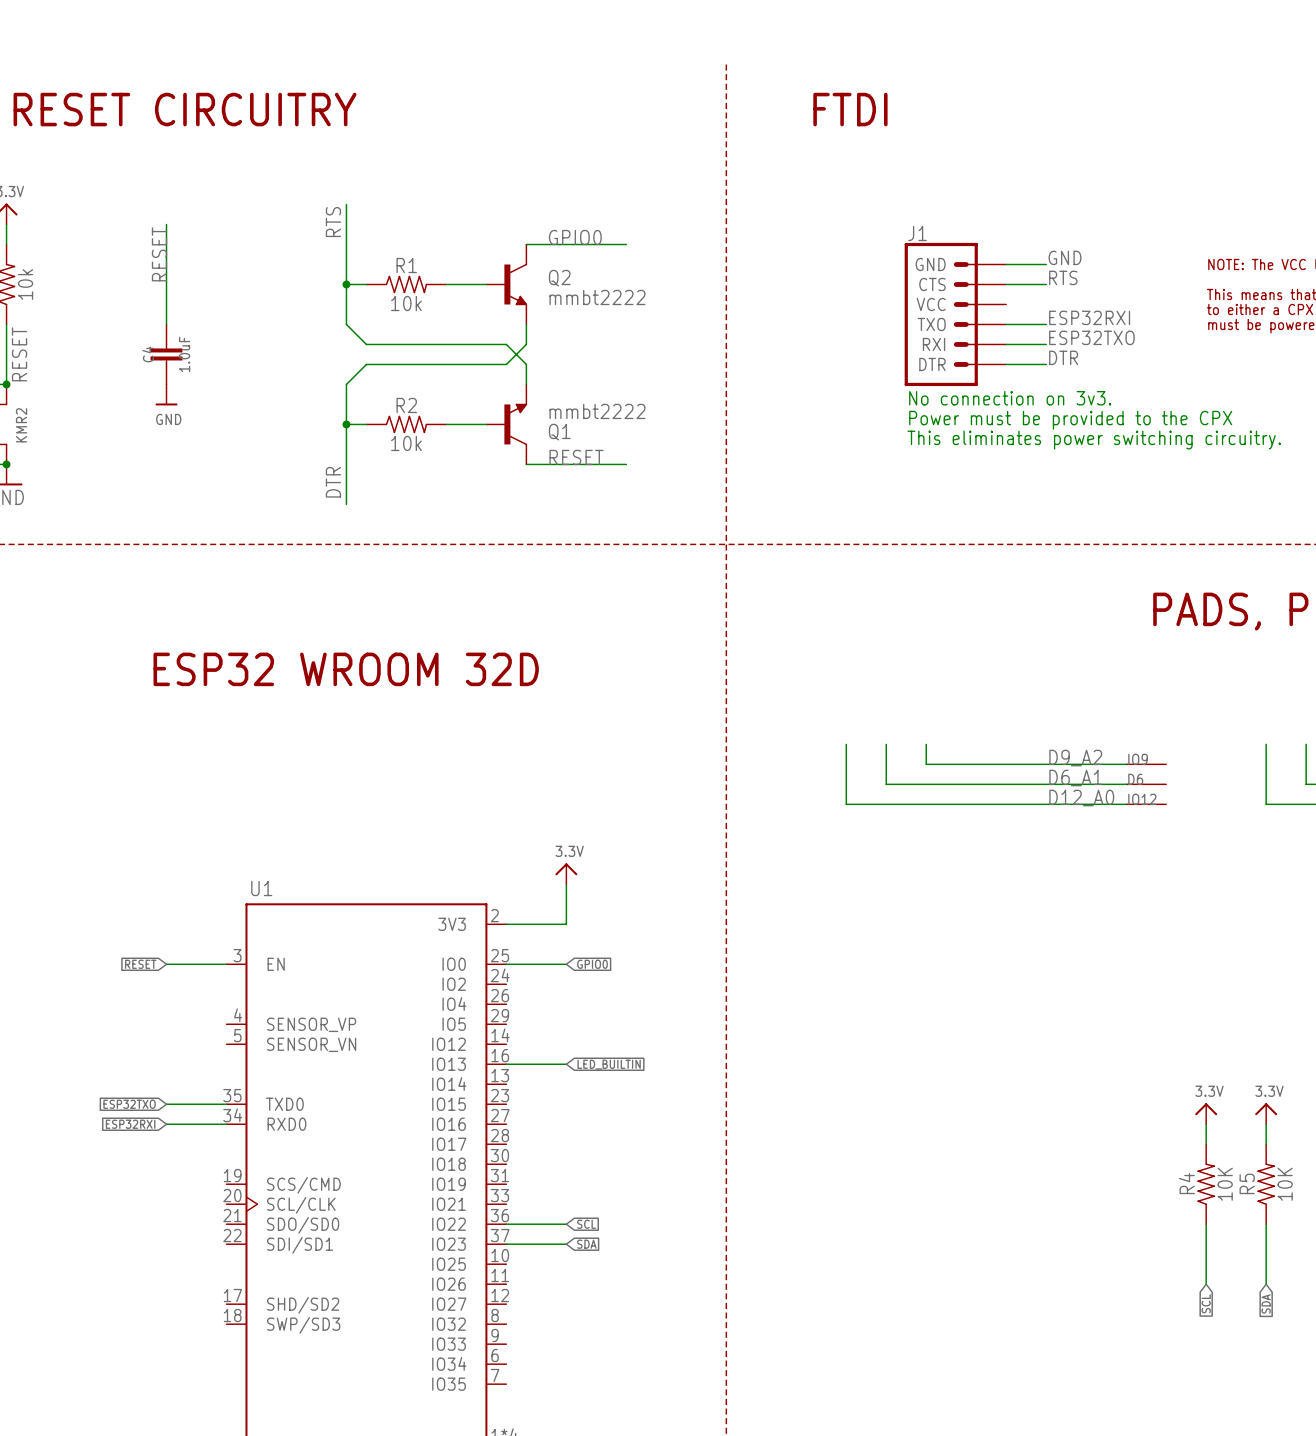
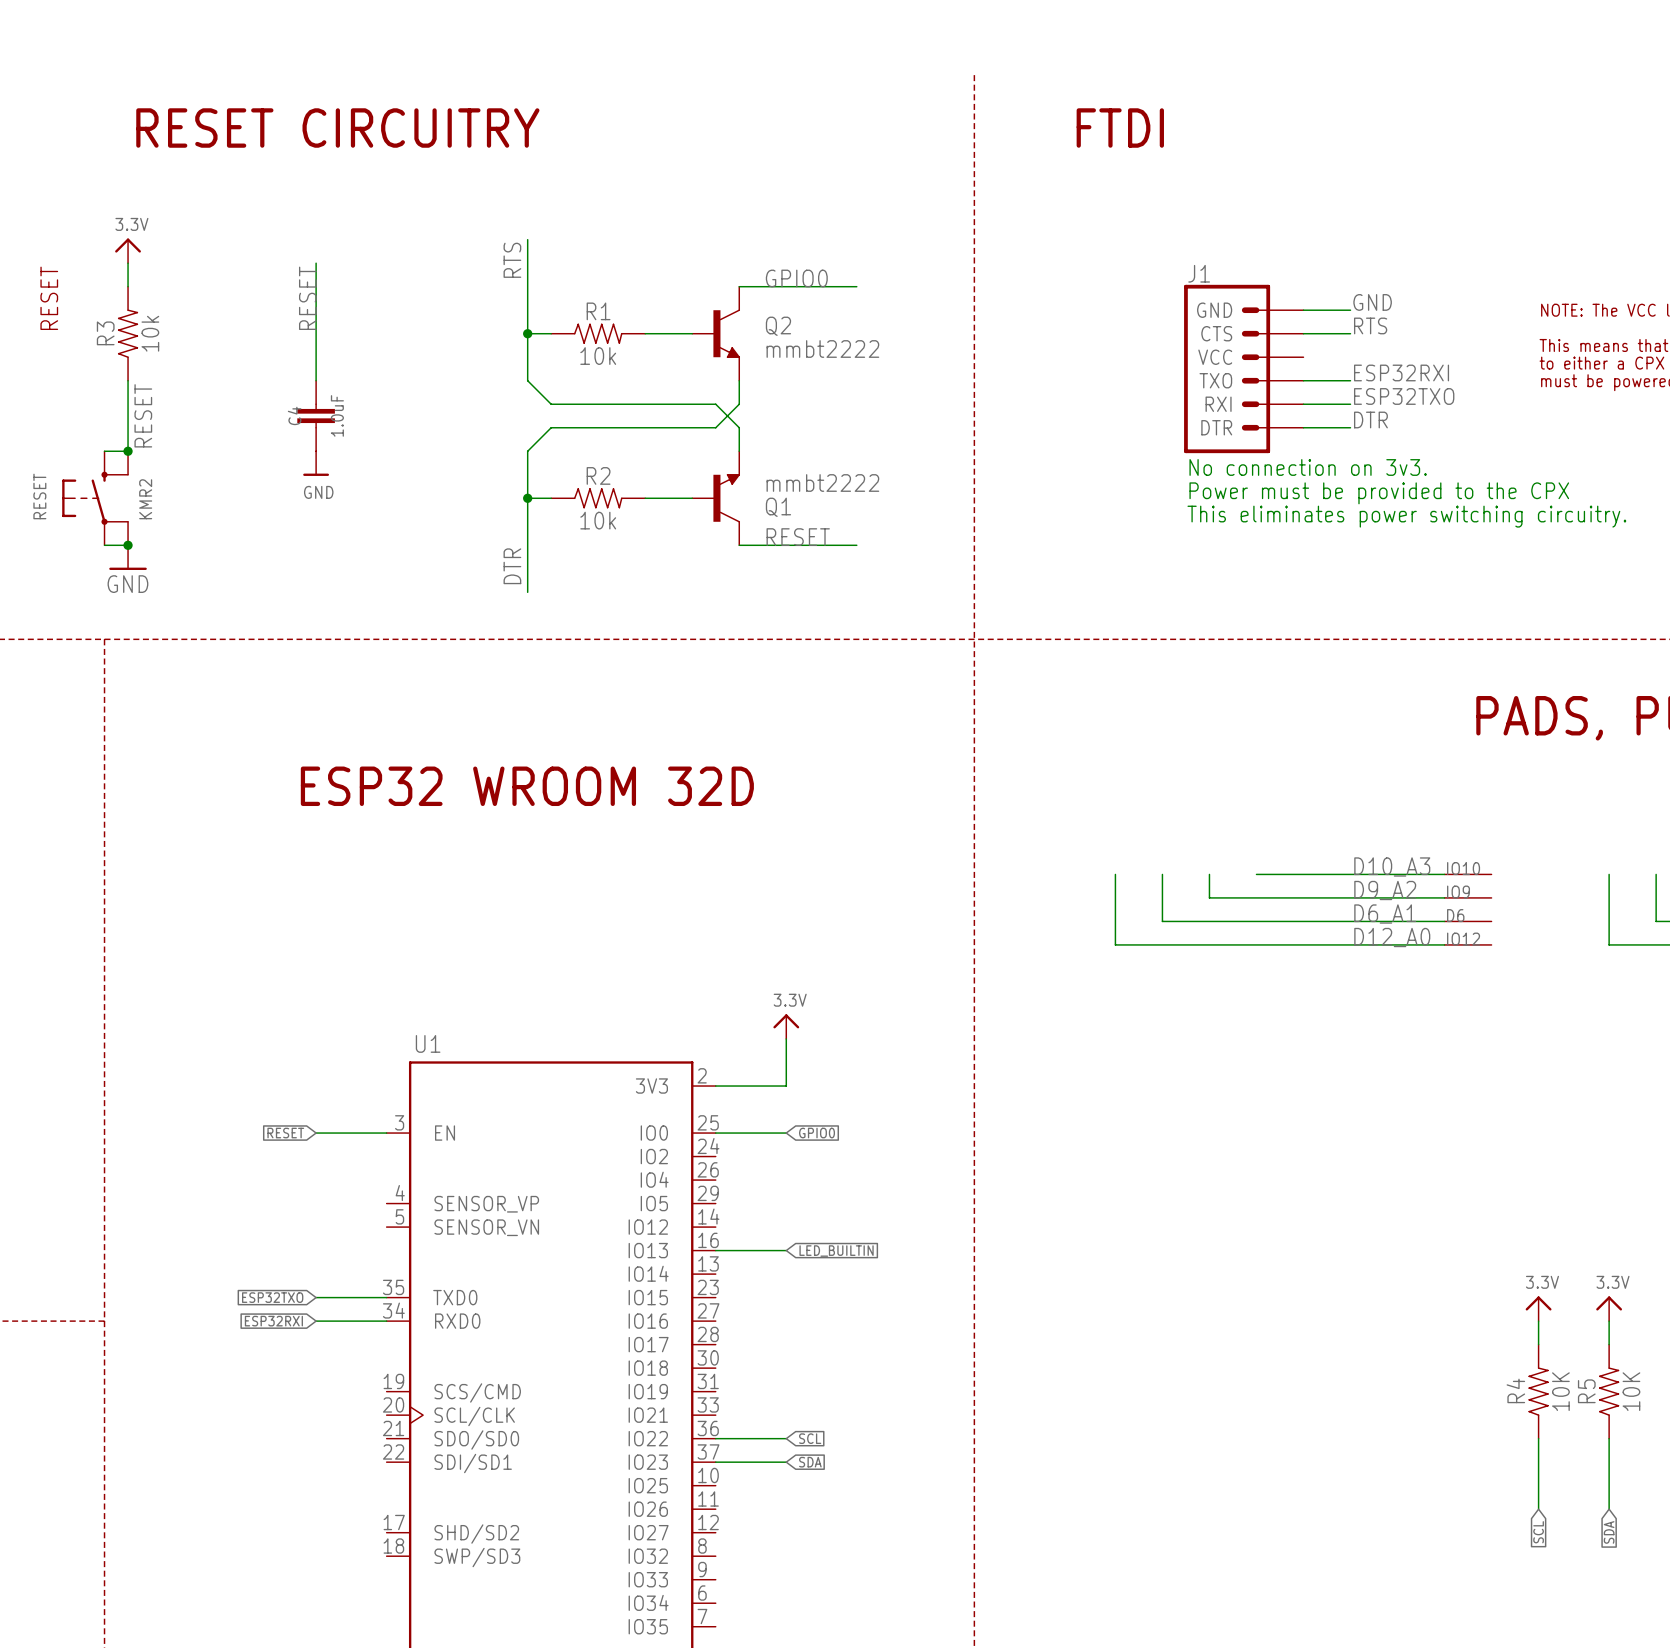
label: none -> D10_A3 (1392, 866)
wire: none -> (1256, 874) (1444, 874)
IO10: none -> (1468, 874)

